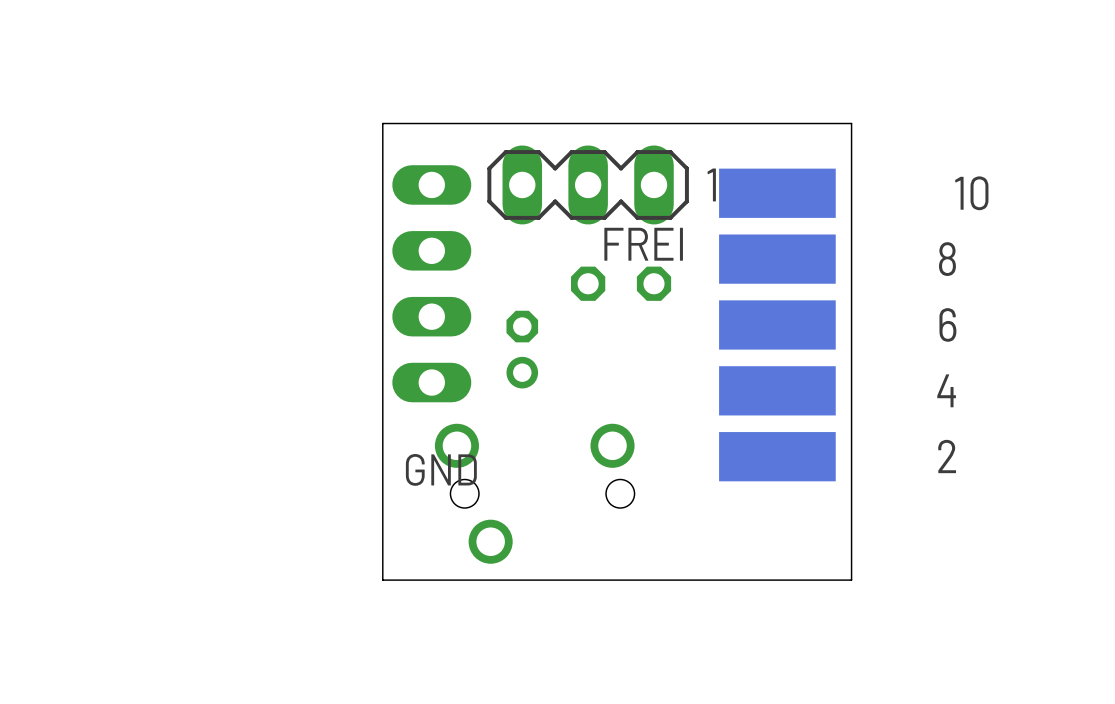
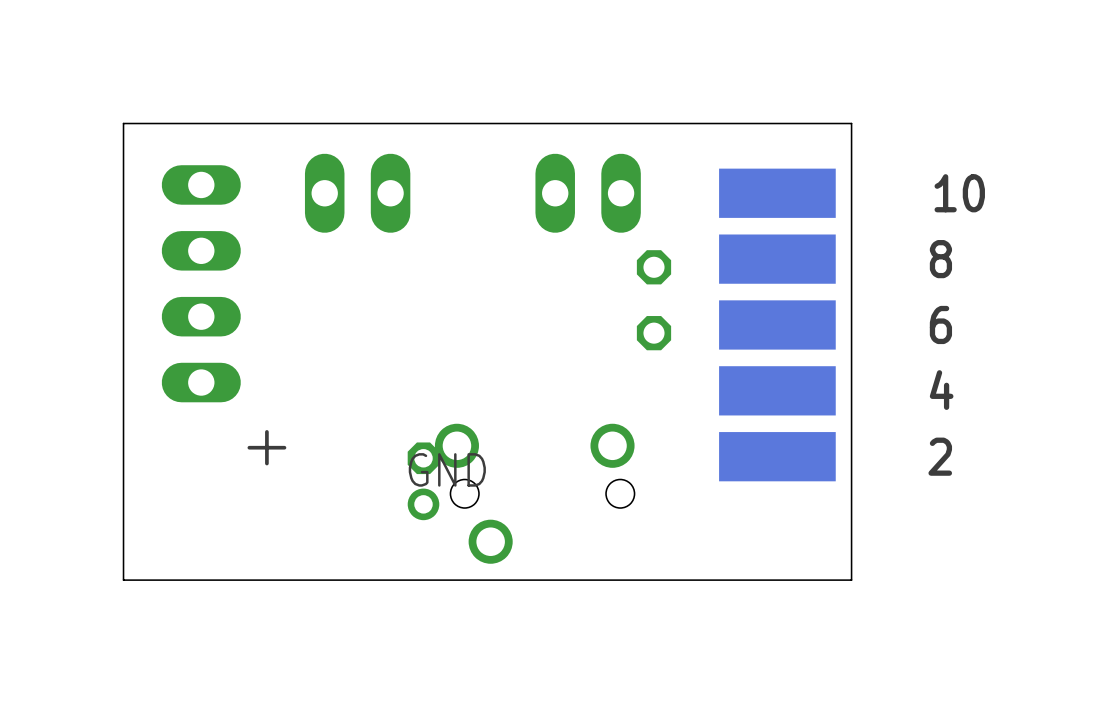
board edge: (382, 123) (382, 580) -> (382, 123) (123, 123) (123, 580) (382, 580)
FREI: (588, 184) -> none
part: none -> (357, 193)
part: none -> (588, 193)
part position: (431, 283) -> (201, 283)
part rotation: 0° (621, 283) -> 90° clockwise (653, 300)
part position: (522, 349) -> (423, 481)
text: none -> + (266, 447)

